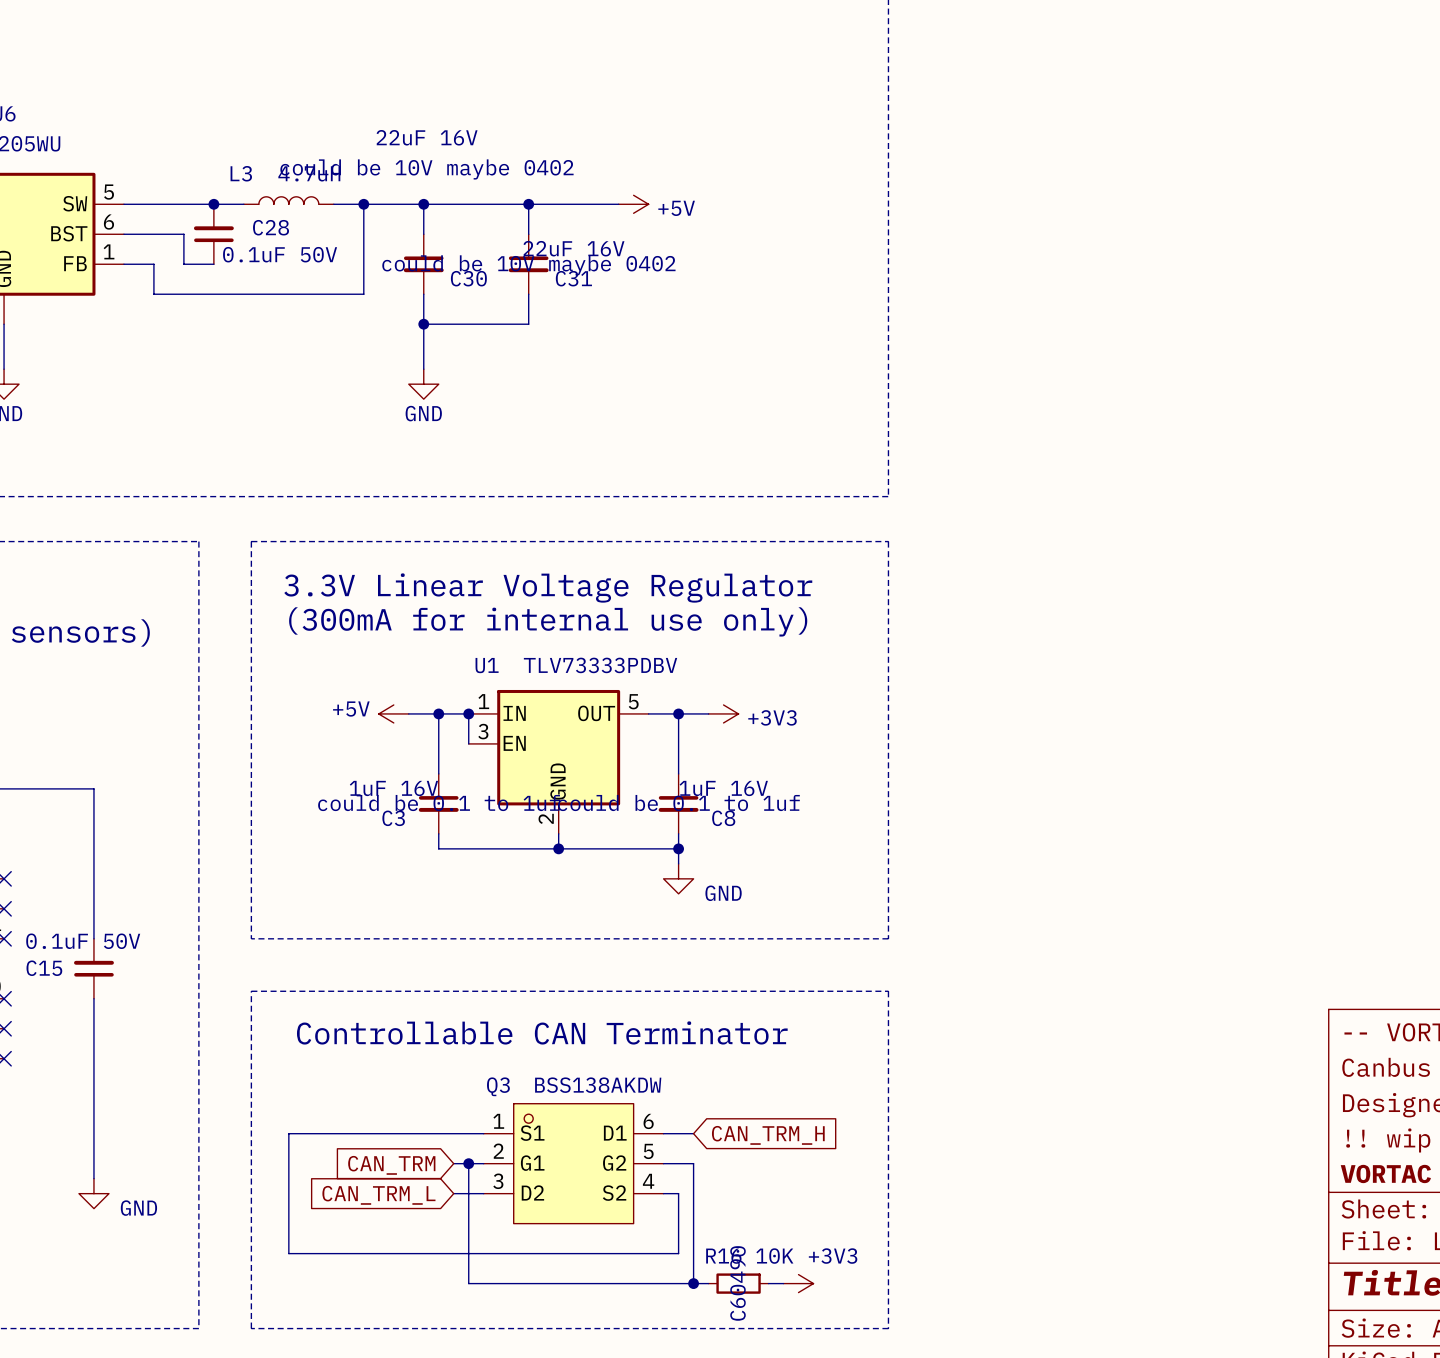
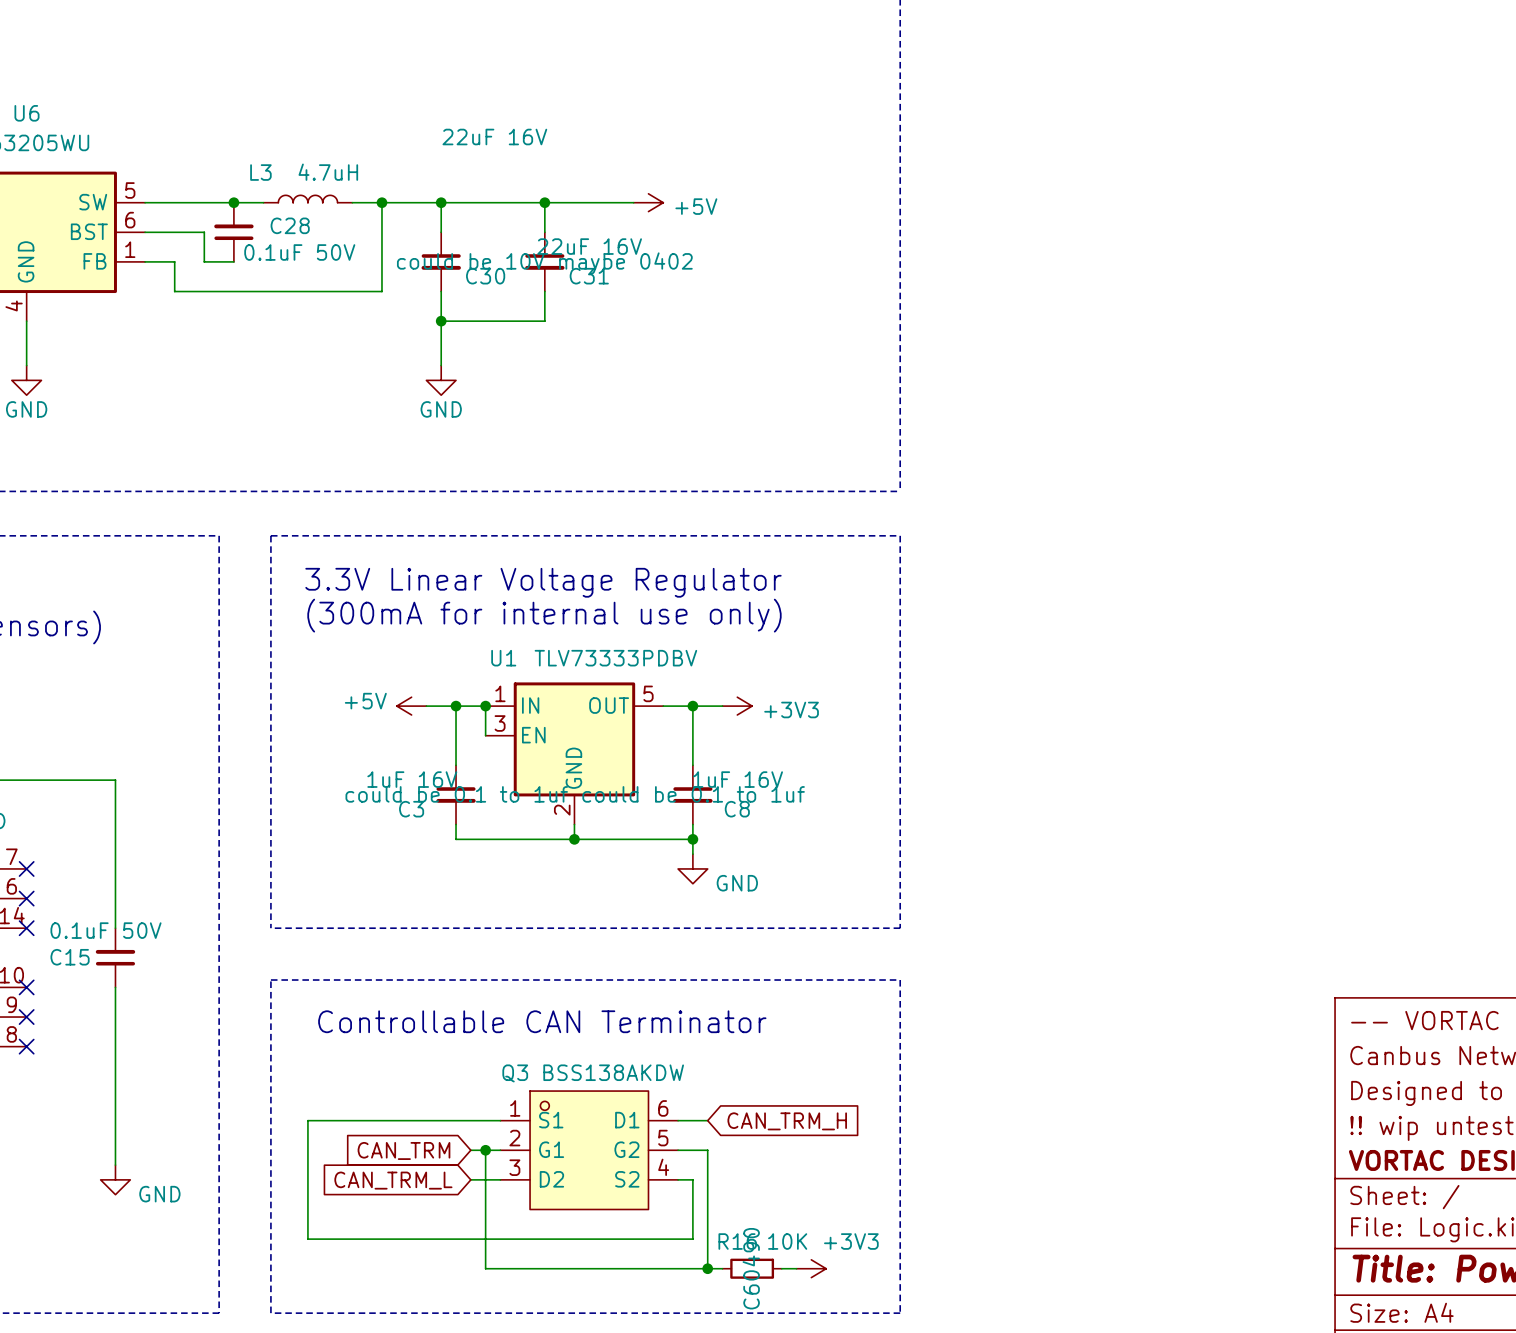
C30 value position: 22uF 16V (427, 137) -> 22uF 16V (494, 137)
C30 text: could be 10V maybe 0402 (426, 169) -> none

